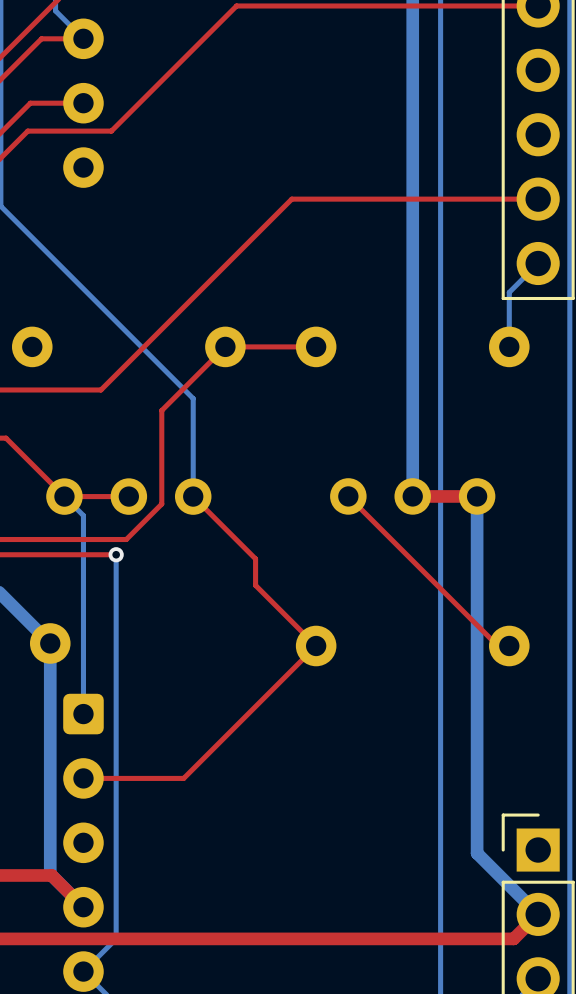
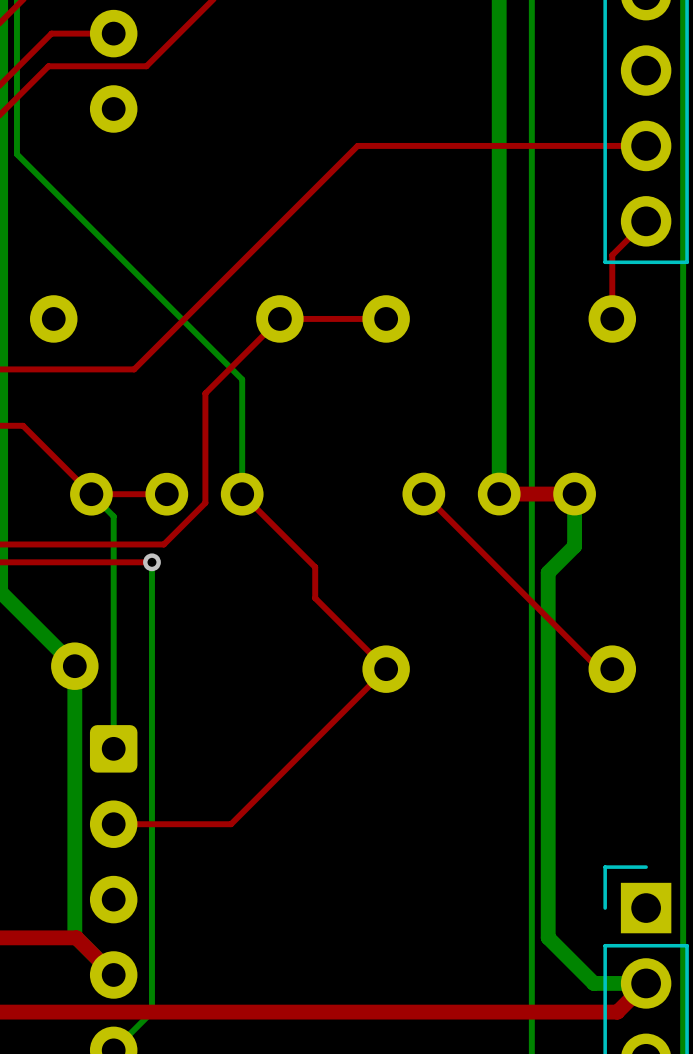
top track: none -> (646, 221) (612, 255) (612, 318)
bottom track: (538, 263) (509, 292) (509, 346) -> none
bottom track: (477, 541) (477, 853) (538, 914) -> (574, 546) (548, 572) (548, 937) (593, 983) (646, 983)

